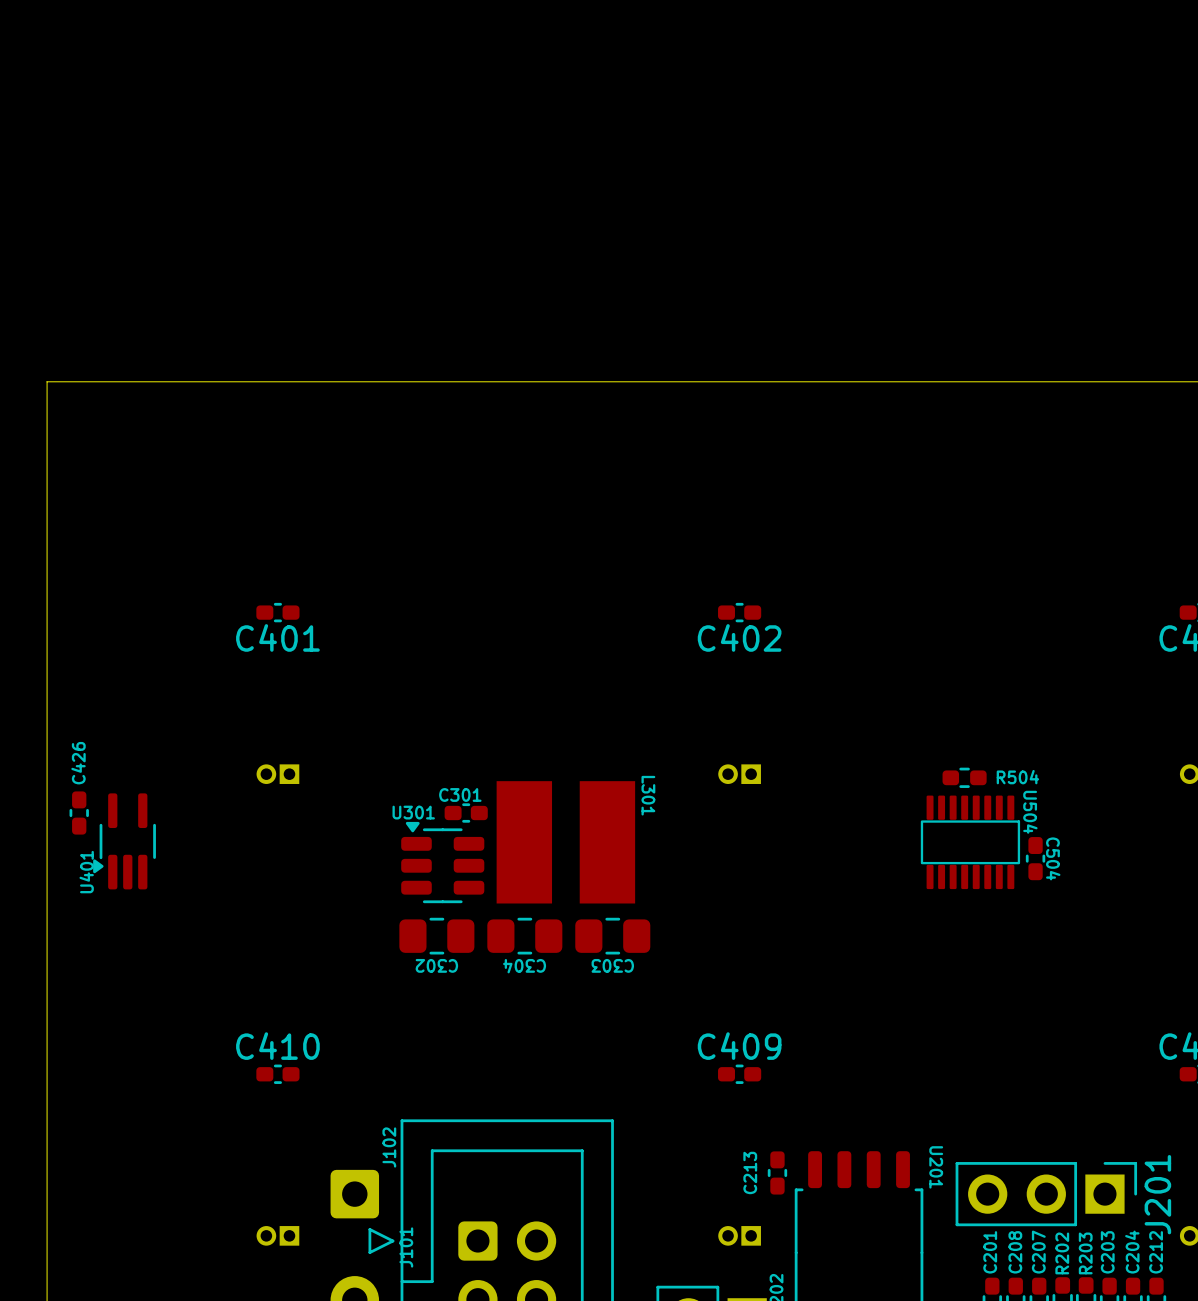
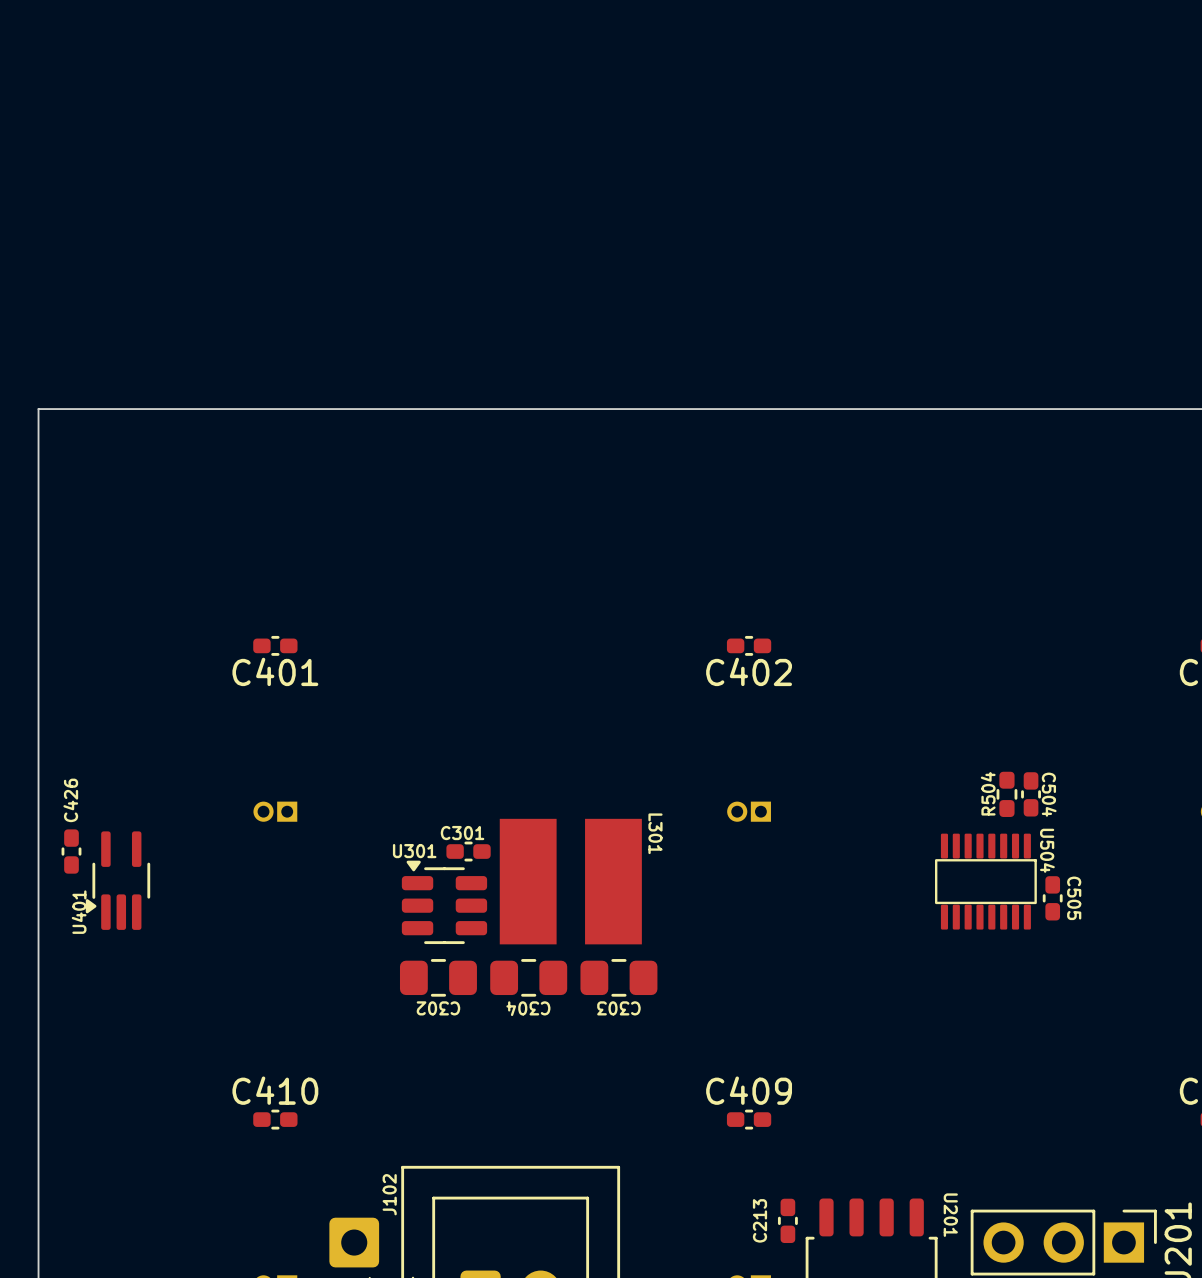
C504: none -> (1031, 794)
R504 rotation: 0° (964, 777) -> 90° clockwise (1006, 794)
R504 position: (964, 777) -> (1006, 794)
R504 name position: R504 (1017, 777) -> R504 (988, 793)
C504 name: C504 (1053, 858) -> C505 (1074, 898)

